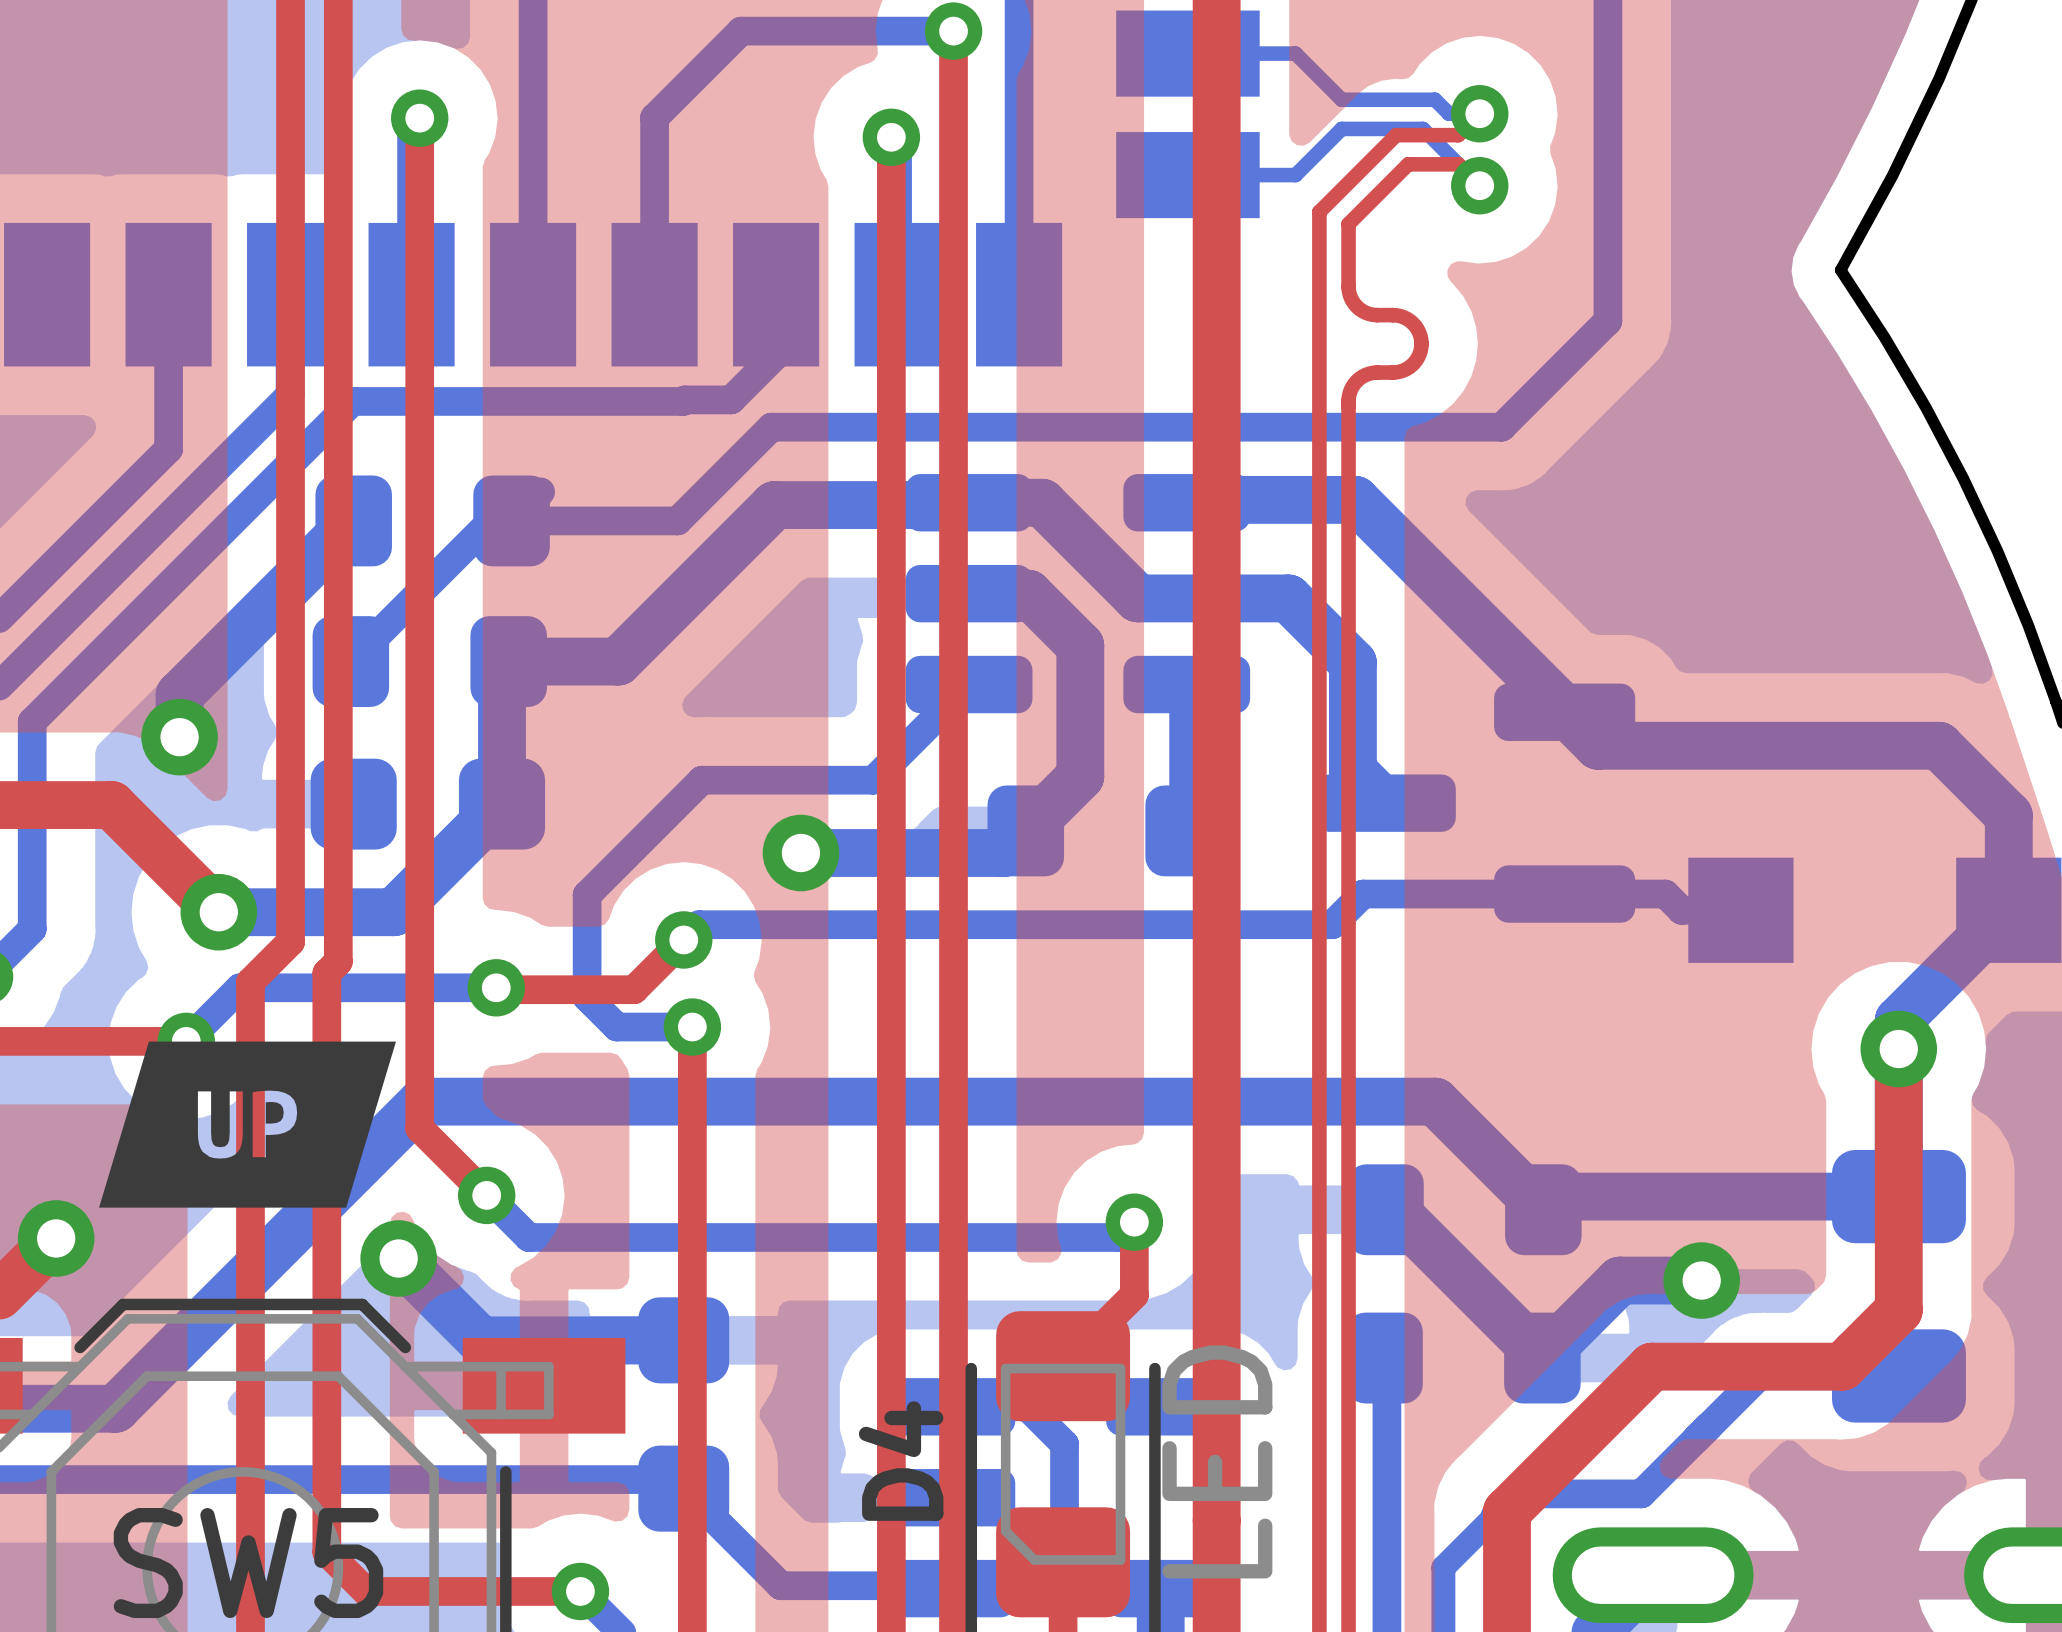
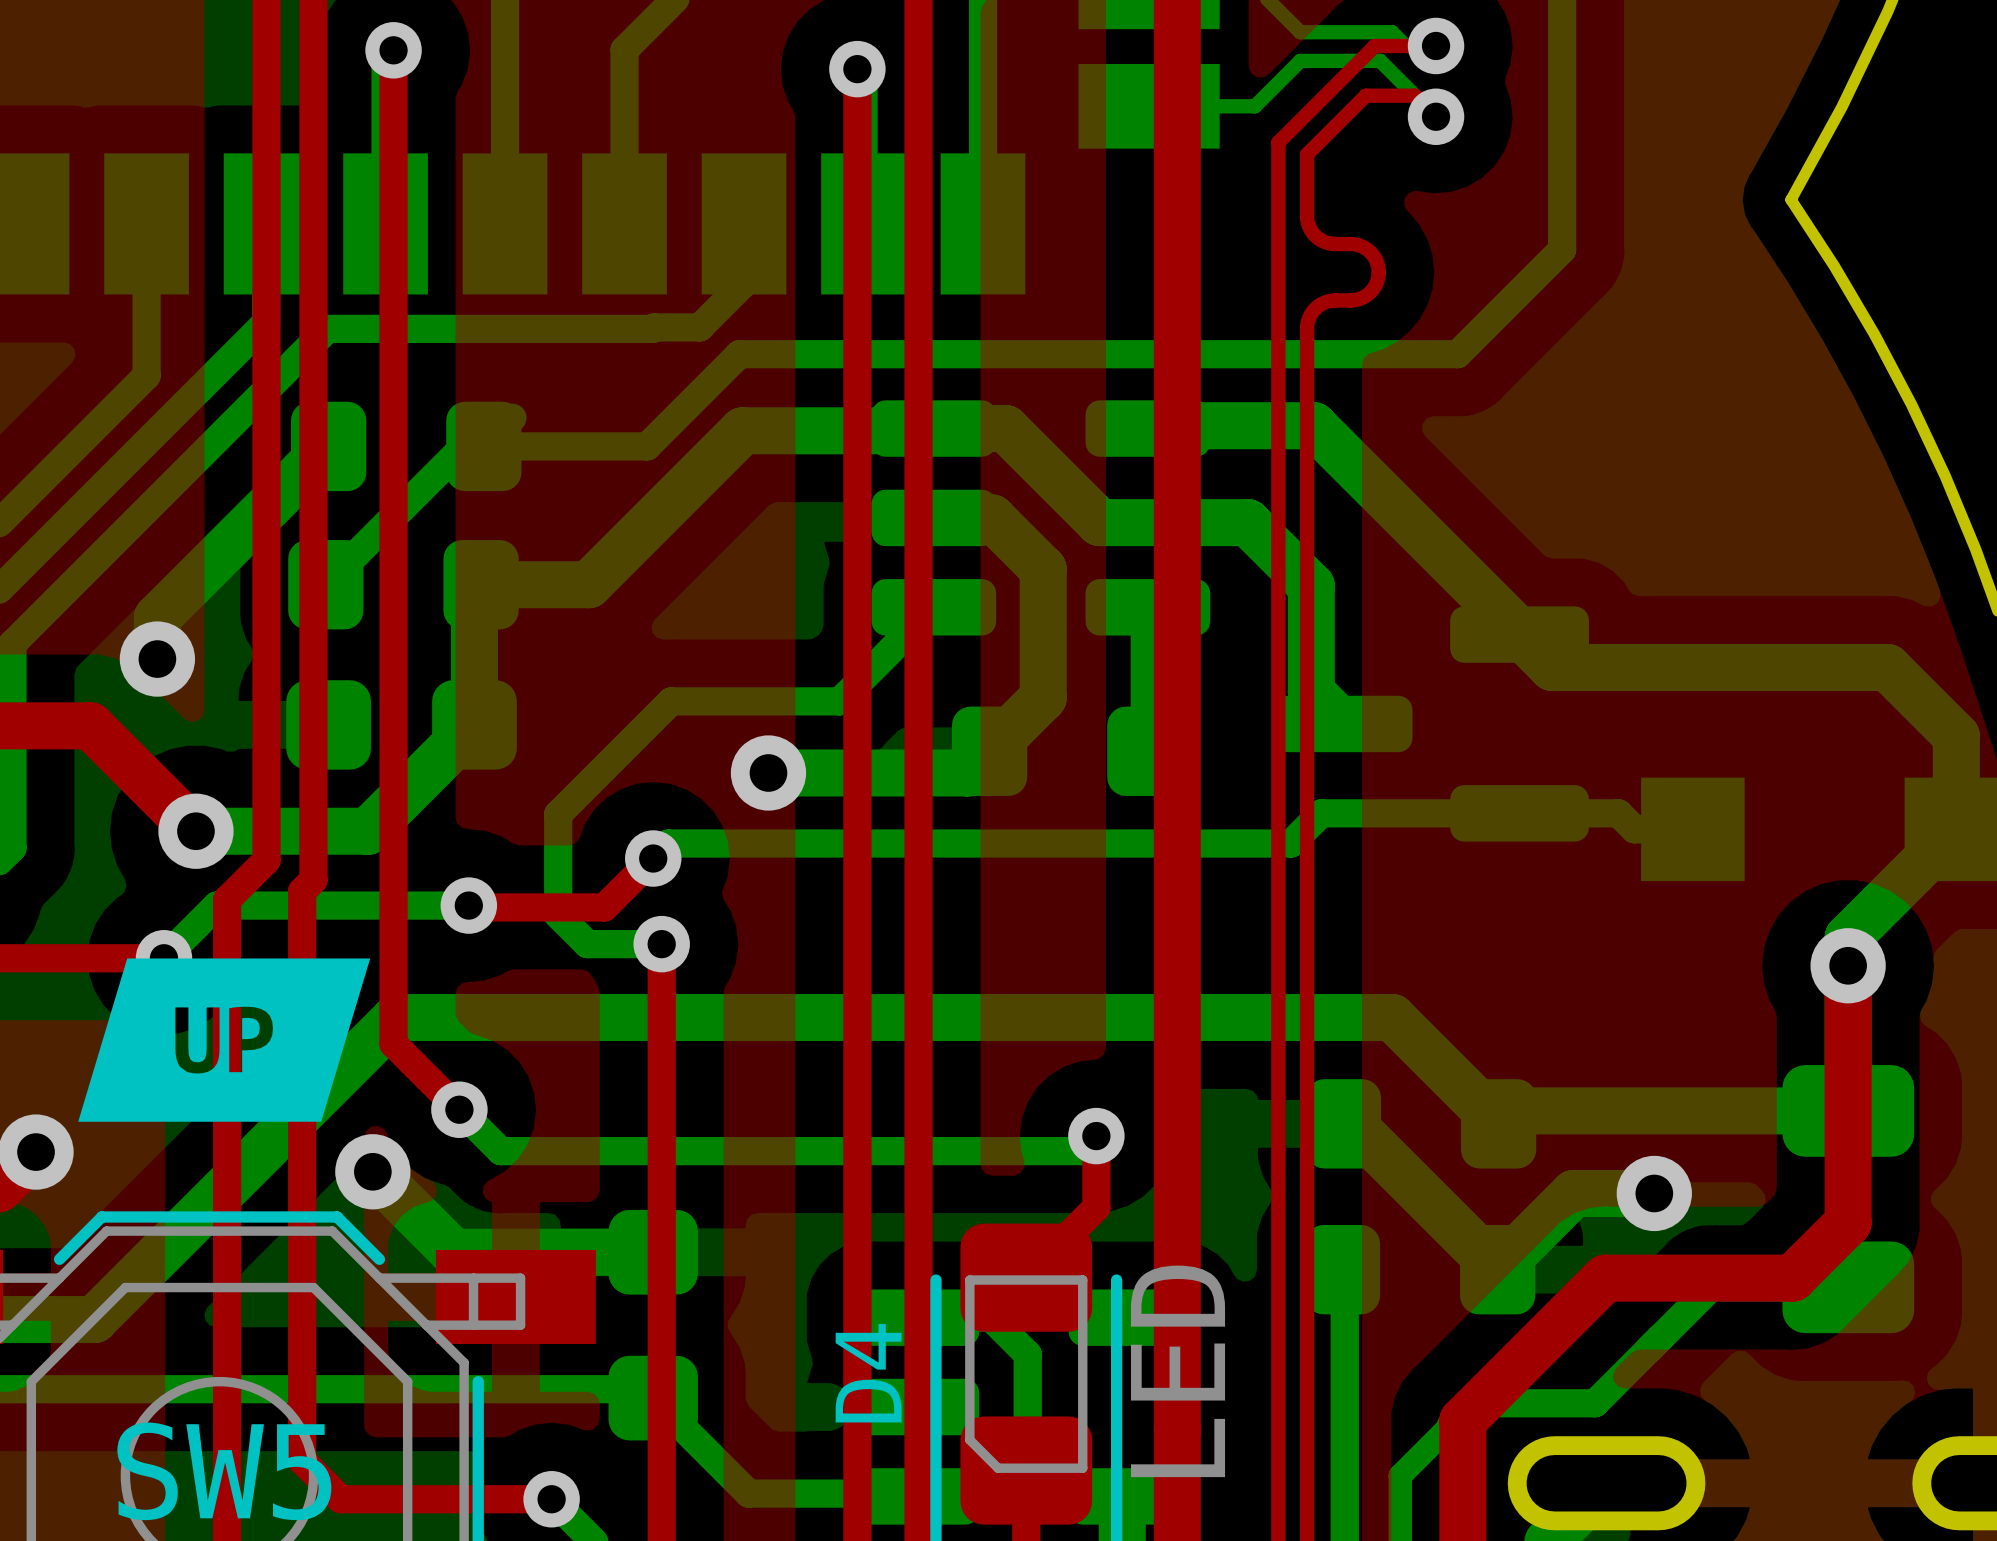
top track: (1479, 113) (1458, 135) (1396, 135) -> (1436, 45) (1374, 45) (1353, 67)

